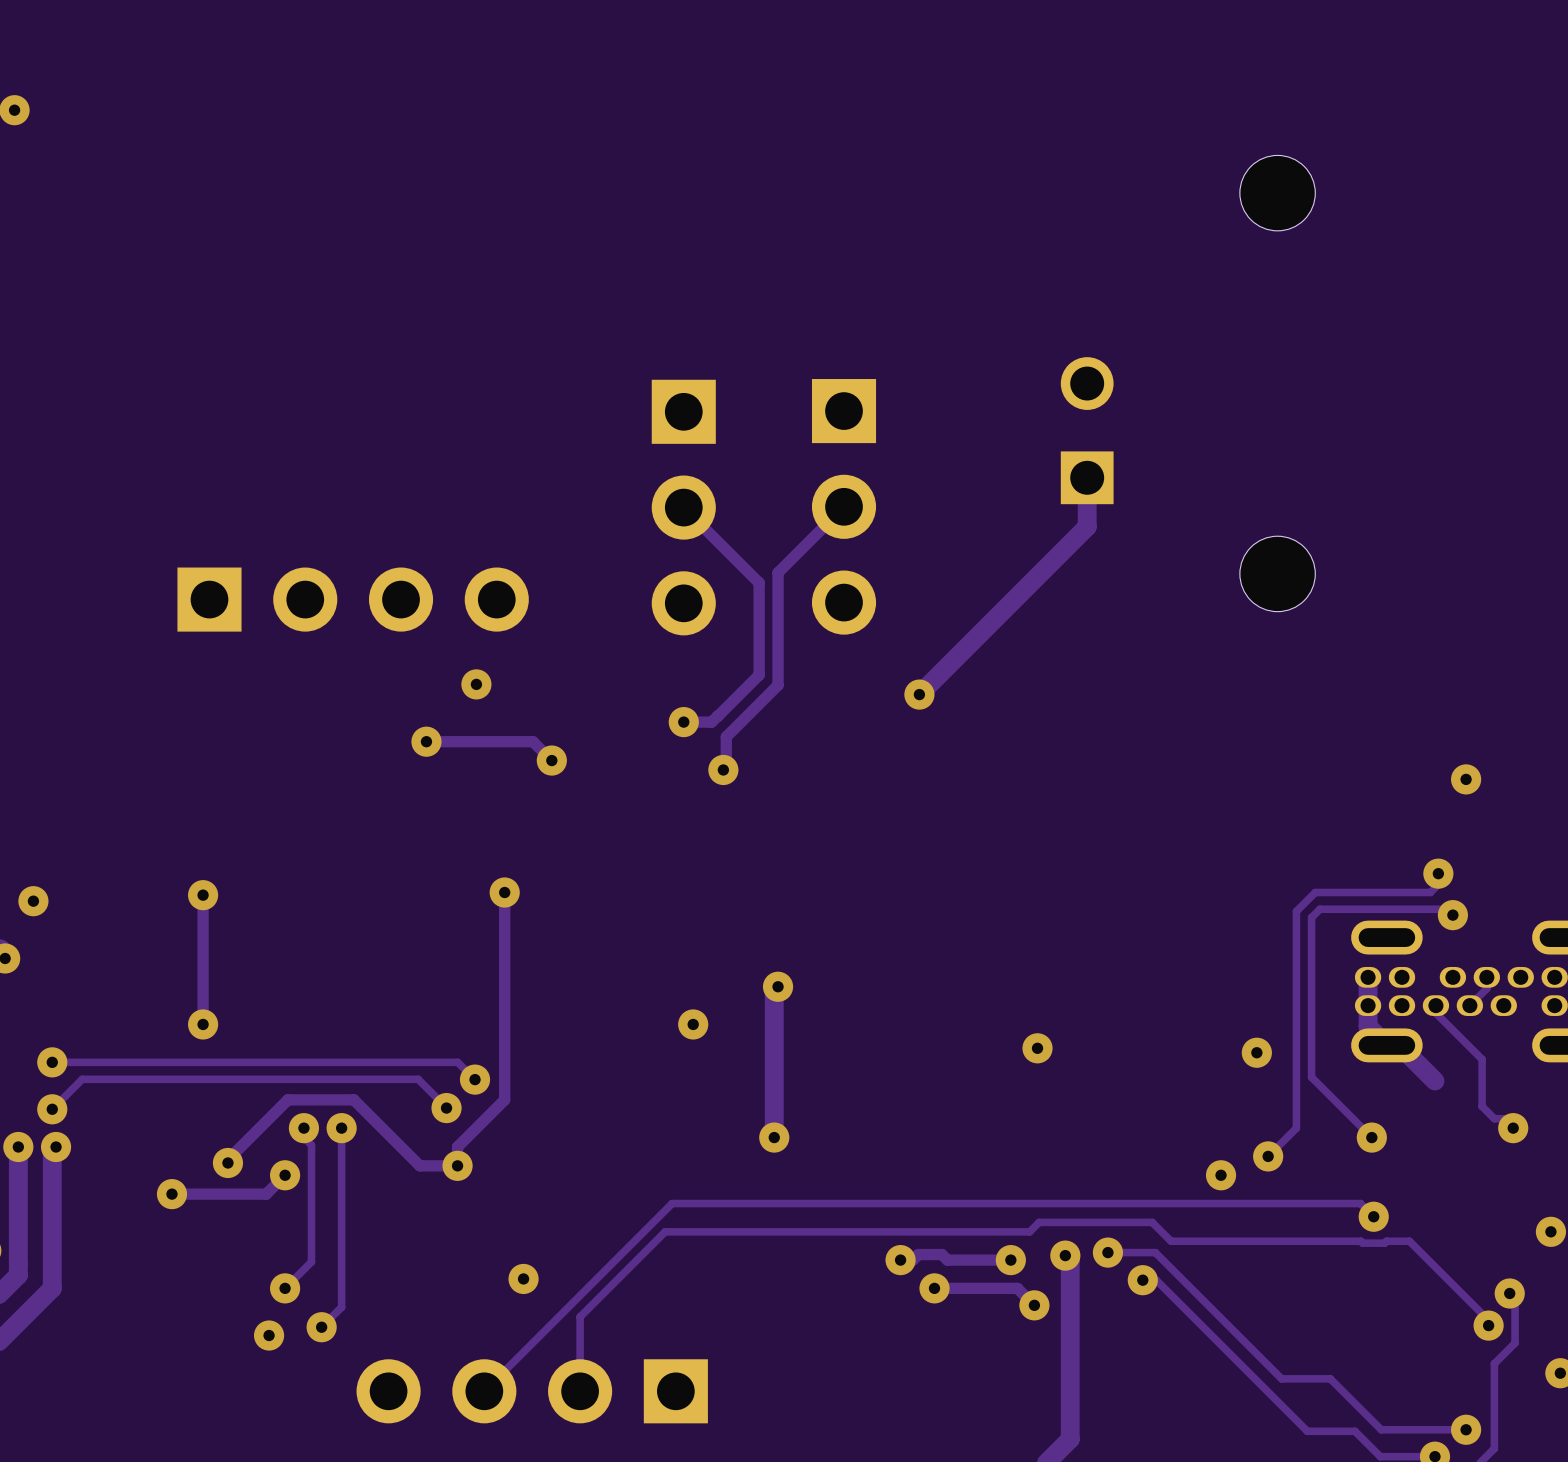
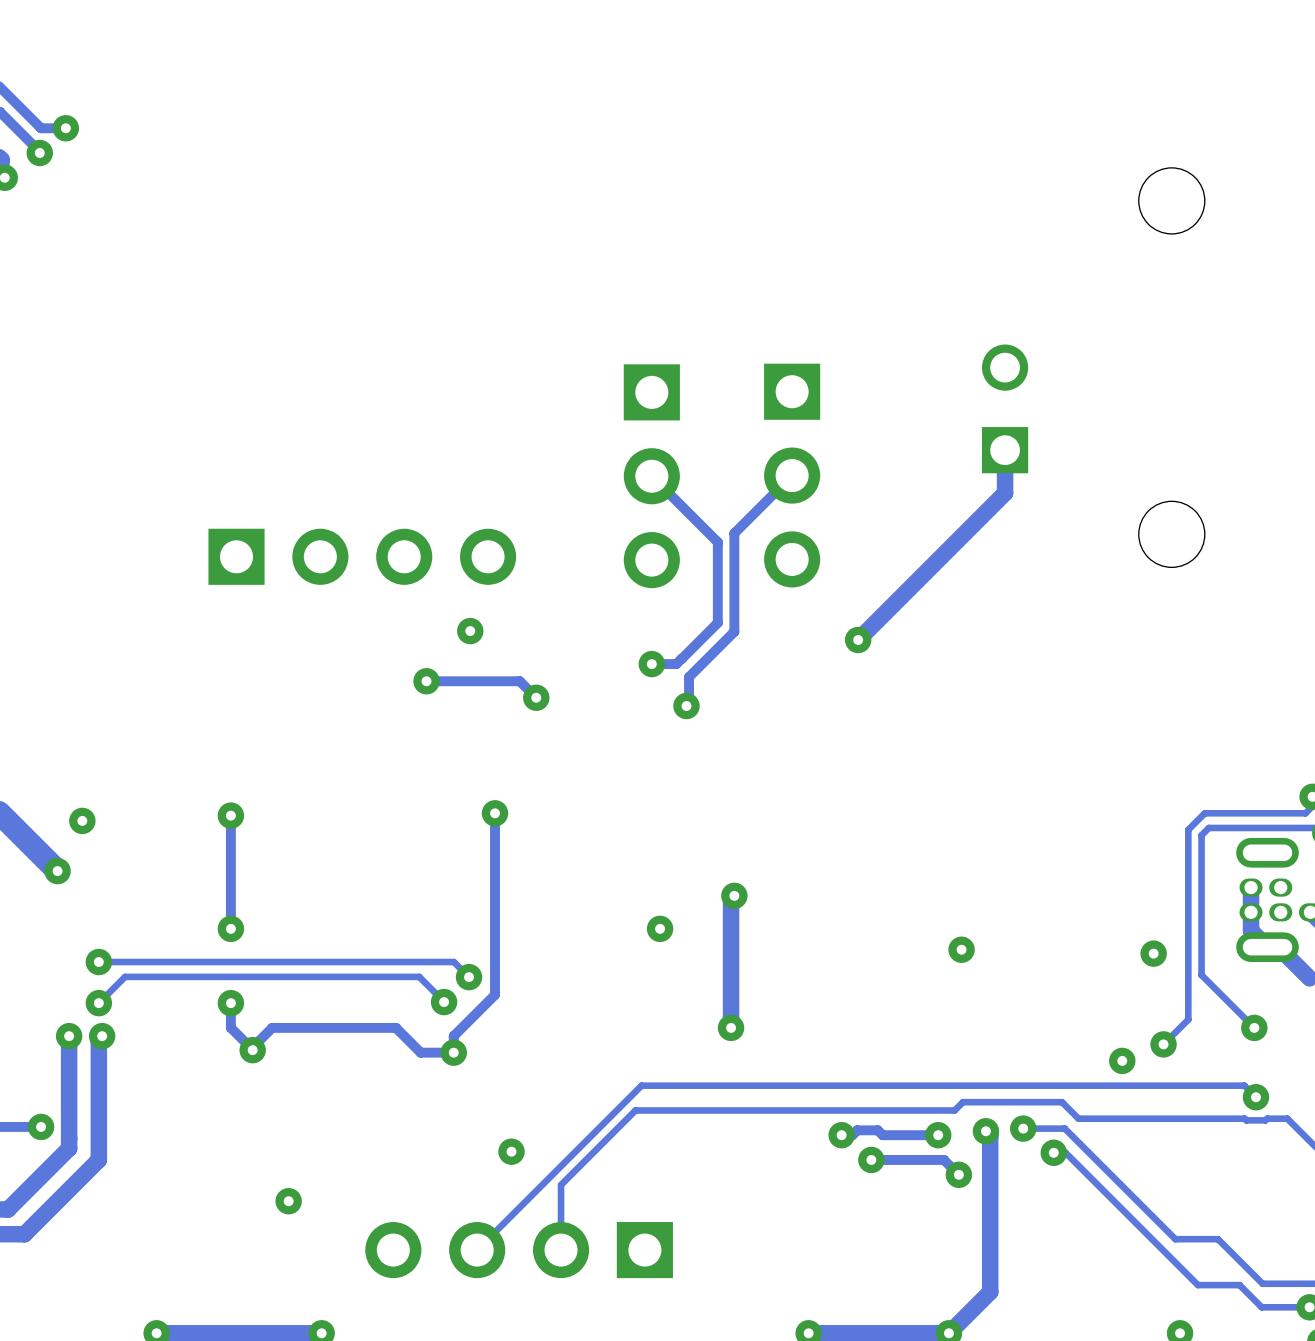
track: none -> (230, 1003) (230, 1027) (252, 1049)
via: none -> (230, 1003)
track: (303, 1128) (303, 1137) (311, 1145) (311, 1261) (285, 1288) -> none
via: (303, 1128) -> none
track: (341, 1128) (341, 1307) (321, 1327) -> none
via: (341, 1128) -> none
track: (391, 1137) (353, 1099) (287, 1099) (250, 1137) -> (395, 1027) (272, 1027)
track: (285, 1175) (266, 1194) (171, 1194) -> none
via: (285, 1175) -> none
via: (171, 1194) -> none
via: (285, 1288) -> none
via: (321, 1327) -> none

